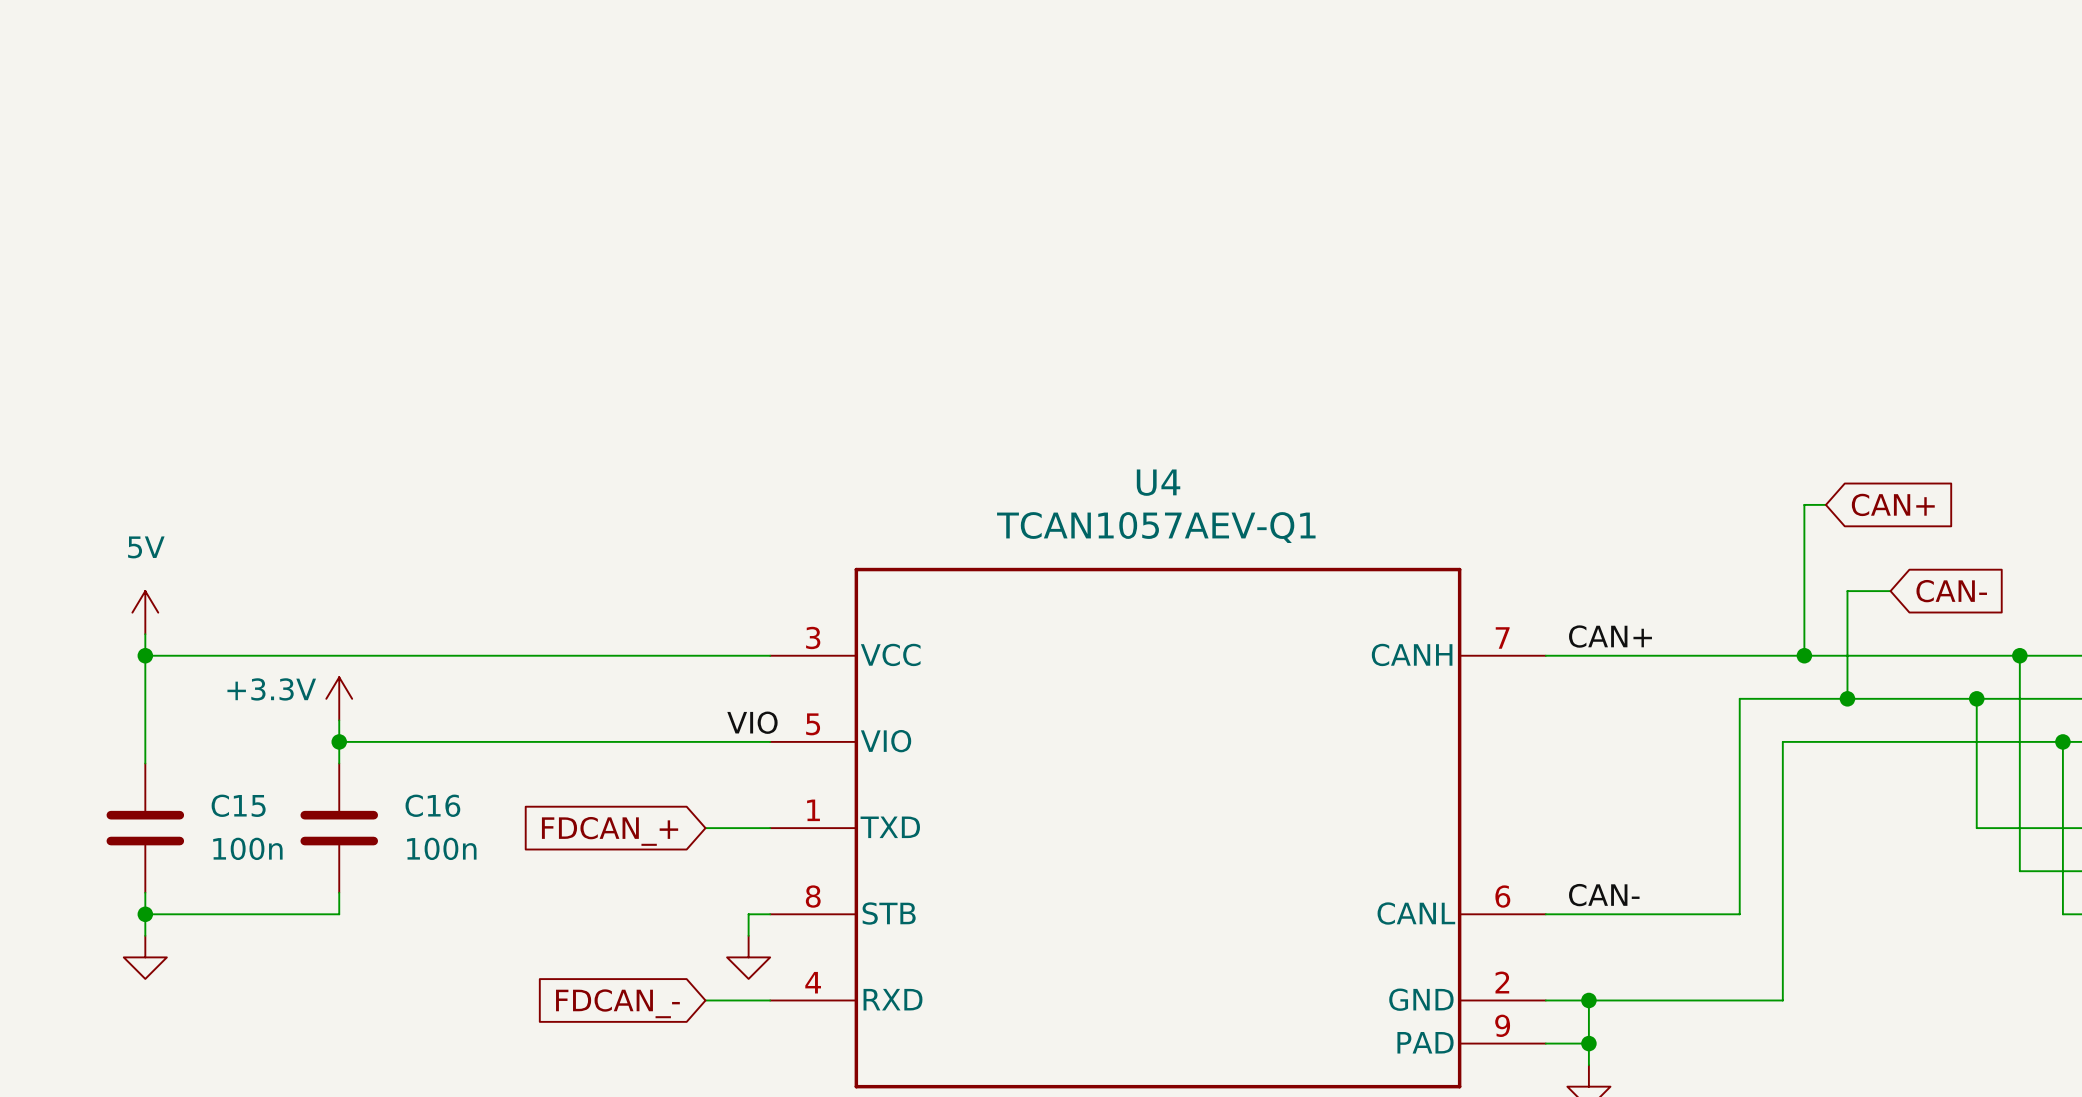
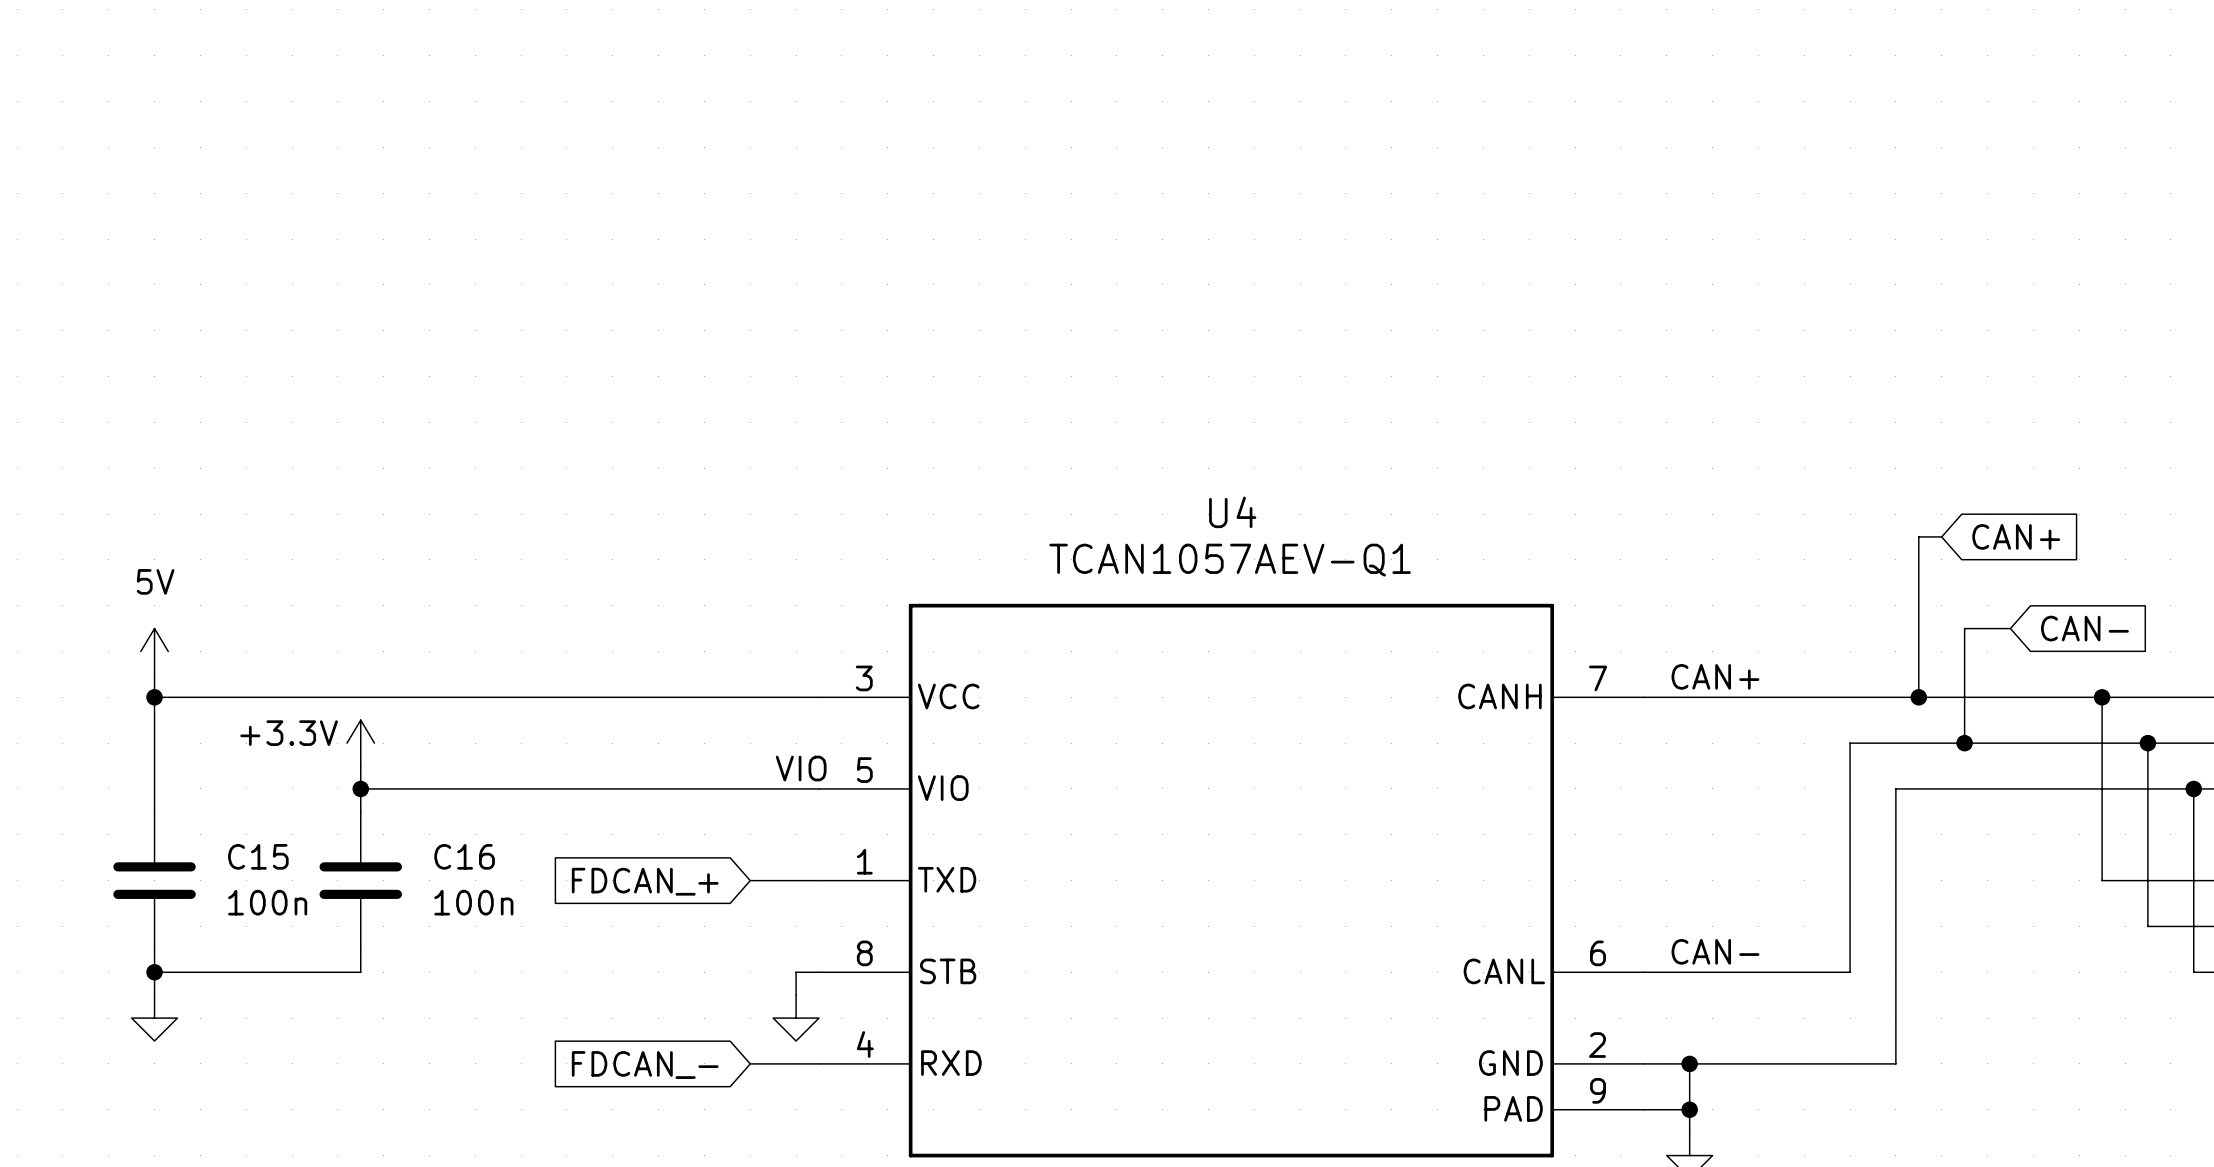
junction: none -> (2102, 697)
wire: (2019, 655) (2019, 698) -> (2102, 697) (2102, 743)
junction: (2019, 655) -> none
junction: (1976, 698) -> none
junction: none -> (2147, 743)

